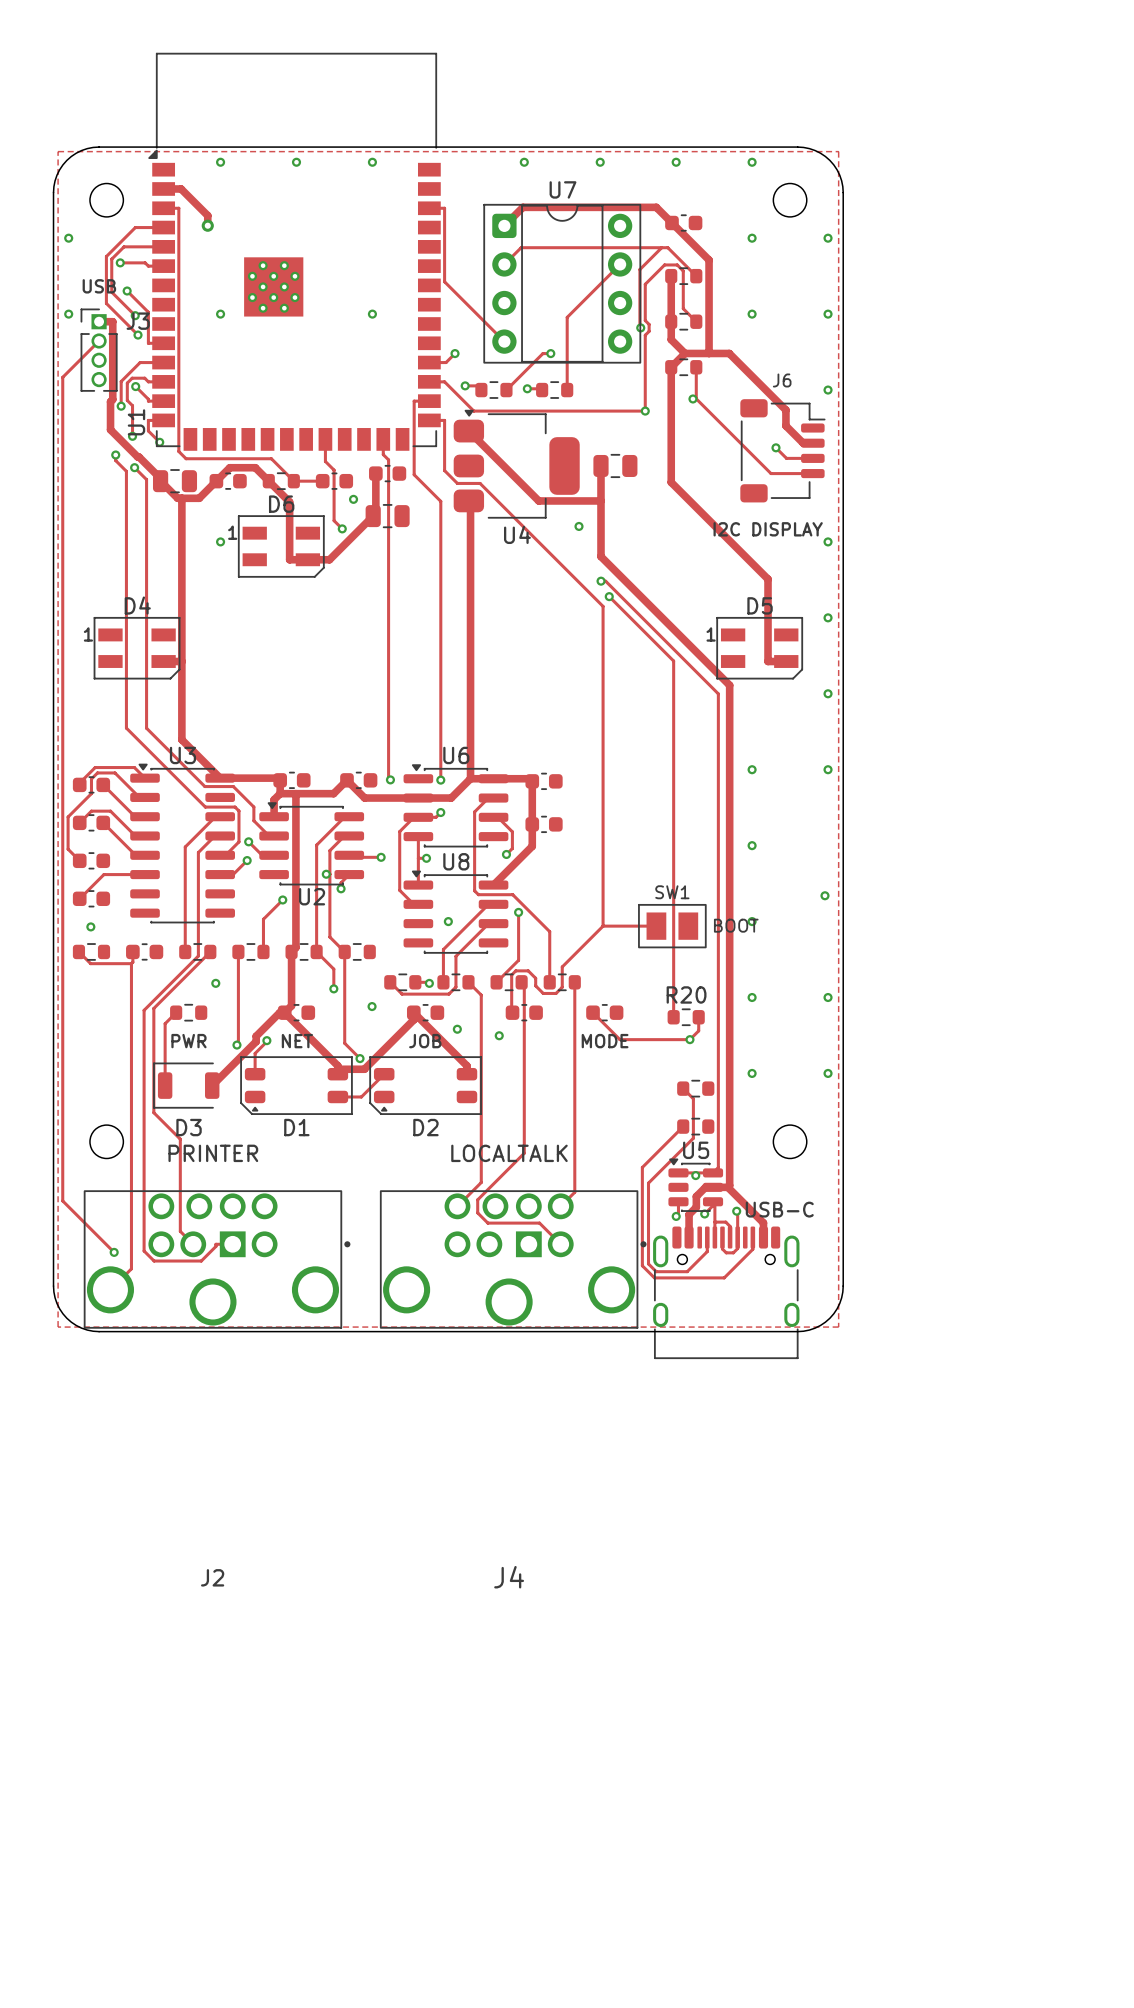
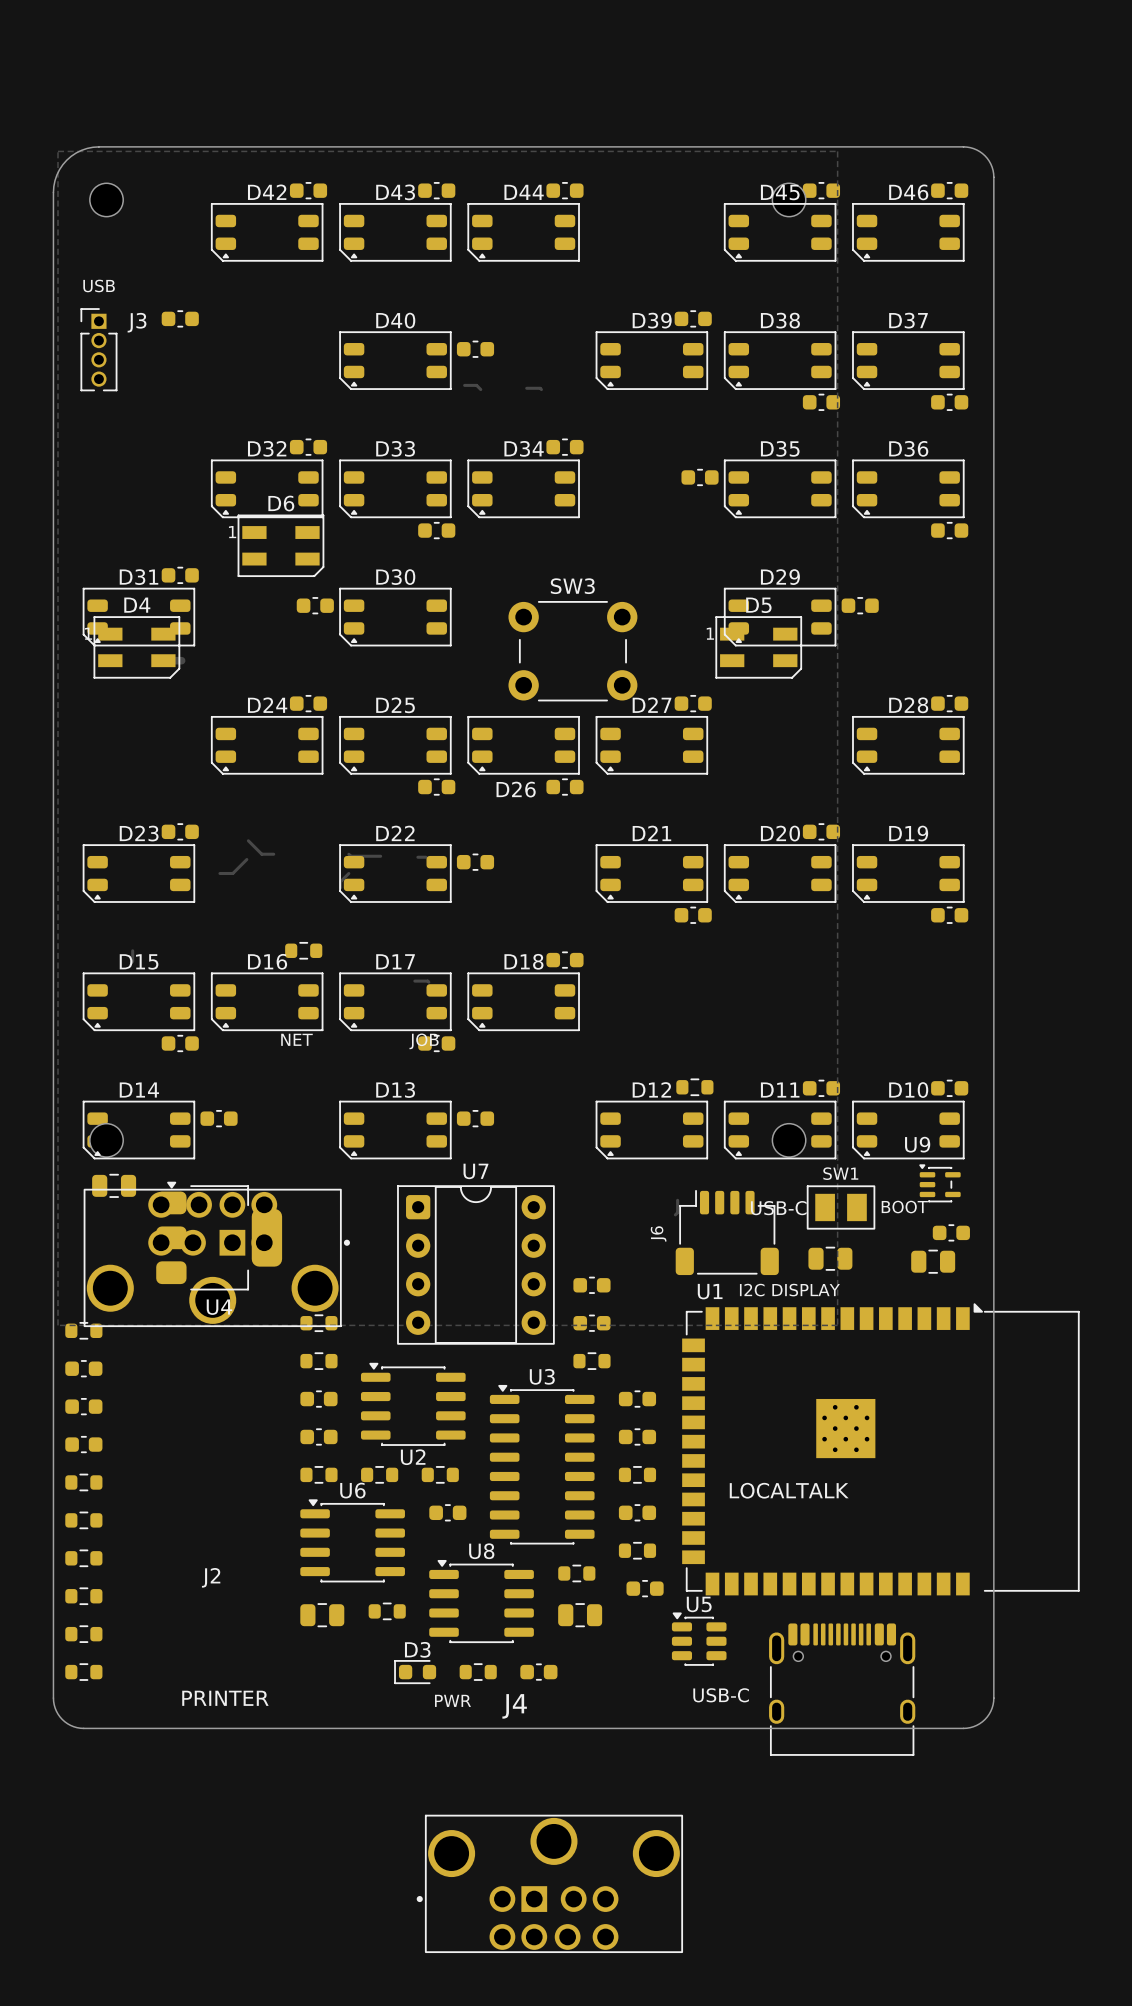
board edge: (797, 147) (815, 150) (829, 160) (839, 175) (843, 192) (843, 1286) (841, 1297) (837, 1308) (829, 1318) (820, 1325) (809, 1330) (797, 1331) (99, 1331) (81, 1328) (66, 1318) (56, 1303) (53, 1286) -> (796, 146) (966, 147) (976, 149) (984, 155) (990, 164) (993, 173) (993, 1698) (989, 1714) (976, 1725) (963, 1728) (83, 1728) (70, 1725) (58, 1714) (53, 1698) (53, 1284)
via: (220, 162) -> none
via: (296, 162) -> none
via: (372, 162) -> none
via: (524, 162) -> none
via: (600, 162) -> none
via: (676, 162) -> none
via: (752, 162) -> none
track: (163, 188) (181, 188) (207, 215) (207, 225) -> none
part: none -> (308, 190)
part: none -> (436, 190)
part: none -> (564, 190)
part: none -> (821, 190)
part: none -> (949, 190)
track: (163, 208) (178, 208) (178, 451) (186, 458) (271, 458) (293, 481) (322, 481) -> none
track: (429, 208) (444, 208) (444, 281) (504, 341) -> none
part: (683, 223) -> none
via: (207, 225) -> none
track: (504, 225) (522, 207) (656, 207) (709, 260) (709, 353) -> none
track: (163, 227) (135, 227) (106, 256) (106, 303) (138, 335) -> none
D42: none -> (267, 232)
D43: none -> (395, 232)
D44: none -> (523, 232)
D45: none -> (780, 232)
D46: none -> (908, 232)
via: (68, 238) -> none
via: (752, 238) -> none
via: (828, 238) -> none
track: (163, 246) (124, 246) (111, 259) (111, 292) (135, 315) -> none
track: (661, 247) (639, 269) (640, 327) -> none
U1 rotation: 0° (294, 251) -> 90° clockwise (880, 1449)
U1 position: (294, 251) -> (880, 1449)
track: (120, 262) (145, 262) (148, 266) (163, 266) -> none
via: (120, 262) -> none
track: (504, 264) (521, 247) (667, 247) (696, 276) -> none
track: (620, 264) (567, 317) (567, 390) -> none
track: (671, 276) (671, 339) (685, 353) -> none
part: (683, 276) -> none
U7 position: (562, 283) -> (475, 1264)
track: (127, 291) (148, 312) (148, 343) (163, 343) -> none
via: (127, 291) -> none
part footprint: [665, 312, 703, 331] -> [674, 310, 712, 328]
via: (68, 314) -> none
via: (220, 314) -> none
via: (372, 314) -> none
via: (752, 314) -> none
via: (828, 314) -> none
via: (135, 315) -> none
part: none -> (180, 318)
track: (99, 321) (112, 321) (112, 399) (110, 401) (110, 429) (160, 478) (160, 481) (177, 498) (199, 498) (229, 467) (255, 467) (289, 502) (289, 559) (329, 559) (375, 513) (375, 473) -> none
track: (696, 321) (683, 308) (683, 271) (677, 264) (664, 264) (645, 284) (645, 320) (649, 324) (649, 331) (645, 335) (645, 411) (473, 411) (444, 381) (429, 381) -> none
via: (640, 327) -> none
via: (138, 335) -> none
track: (99, 340) (62, 377) (62, 1200) (114, 1252) -> none
part: none -> (475, 349)
track: (455, 353) (446, 362) (429, 362) -> none
via: (455, 353) -> none
track: (550, 353) (542, 353) (506, 390) -> none
via: (550, 353) -> none
track: (685, 353) (729, 353) (785, 410) (785, 425) (803, 443) (812, 443) -> none
track: (685, 353) (671, 367) (671, 482) (768, 579) (768, 661) (786, 661) -> none
D40: none -> (395, 360)
D39: none -> (651, 360)
D38: none -> (780, 360)
D37: none -> (908, 360)
track: (163, 362) (140, 362) (121, 381) (121, 406) -> none
part: (683, 367) -> none
track: (696, 367) (696, 398) -> none
track: (163, 381) (148, 381) (144, 378) (132, 378) (127, 383) (127, 400) (132, 405) (132, 436) -> none
via: (465, 385) -> none
track: (135, 386) (148, 401) (163, 401) -> none
via: (135, 386) -> none
via: (527, 388) -> none
part: (493, 390) -> none
part: (554, 390) -> none
via: (828, 390) -> none
via: (692, 398) -> none
track: (696, 398) (771, 473) (812, 473) -> none
track: (429, 401) (414, 401) (414, 474) (440, 501) (440, 780) -> none
part: none -> (821, 402)
part: none -> (949, 402)
via: (121, 406) -> none
via: (645, 411) -> none
track: (163, 420) (148, 420) (148, 430) (159, 442) -> none
track: (429, 420) (444, 420) (444, 470) (457, 483) (480, 483) (603, 606) (603, 926) -> none
track: (468, 431) (538, 500) (600, 500) -> none
via: (132, 436) -> none
track: (325, 439) (325, 461) (334, 470) (334, 520) (342, 528) -> none
track: (383, 439) (383, 454) (388, 459) (388, 778) (390, 779) -> none
via: (159, 442) -> none
part: none -> (308, 447)
part: none -> (564, 447)
track: (775, 447) (786, 458) (812, 458) -> none
via: (775, 447) -> none
J6 rotation: 0° (782, 450) -> 90° counterclockwise (727, 1232)
J6 position: (782, 450) -> (727, 1232)
track: (115, 455) (115, 460) (126, 471) (126, 728) (205, 807) (235, 807) (238, 811) (238, 841) (225, 855) (220, 855) -> none
via: (115, 455) -> none
U4 position: (516, 464) -> (219, 1236)
track: (600, 465) (600, 556) (729, 685) (729, 1185) (727, 1187) -> none
part: (615, 465) -> none
track: (134, 467) (146, 479) (146, 728) (204, 786) (233, 786) (253, 807) (253, 820) (269, 836) (274, 836) -> none
via: (134, 467) -> none
part: (387, 473) -> none
part: none -> (700, 477)
part: (175, 481) -> none
part: (228, 481) -> none
part: (281, 481) -> none
part: (334, 481) -> none
D32: none -> (267, 488)
D33: none -> (395, 488)
D34: none -> (523, 488)
D35: none -> (780, 488)
D36: none -> (908, 488)
track: (181, 498) (181, 739) (220, 778) (277, 778) (280, 780) (280, 793) -> none
via: (353, 499) -> none
track: (468, 500) (470, 502) (470, 778) -> none
part: (387, 516) -> none
via: (579, 526) -> none
via: (342, 528) -> none
text: I2C DISPLAY (768, 529) -> none
part: none -> (436, 530)
part: none -> (949, 530)
via: (220, 541) -> none
via: (828, 541) -> none
part: none -> (180, 575)
track: (601, 581) (605, 581) (718, 693) (718, 1167) (713, 1172) (678, 1172) -> none
via: (601, 581) -> none
track: (609, 596) (673, 661) (673, 1017) -> none
via: (609, 596) -> none
part: none -> (315, 605)
part: none -> (860, 605)
D31: none -> (138, 617)
D30: none -> (395, 617)
D29: none -> (780, 617)
via: (828, 617) -> none
SW3: none -> (572, 651)
via: (828, 693) -> none
part: none -> (308, 703)
part: none -> (693, 703)
part: none -> (949, 703)
D24: none -> (267, 745)
D25: none -> (395, 745)
D26: none -> (523, 745)
D27: none -> (651, 745)
D28: none -> (908, 745)
via: (752, 769) -> none
via: (828, 769) -> none
track: (145, 778) (134, 767) (95, 767) (79, 784) -> none
track: (470, 778) (529, 778) (532, 781) (532, 846) (493, 885) -> none
track: (470, 778) (451, 798) (364, 798) (346, 780) (333, 793) (280, 793) -> none
via: (390, 779) -> none
part: (291, 780) -> none
part: (358, 780) -> none
via: (440, 780) -> none
part: (544, 781) -> none
part: (91, 784) -> none
track: (103, 784) (135, 816) (145, 816) -> none
part: none -> (436, 787)
part: none -> (564, 787)
track: (280, 793) (274, 799) (274, 816) -> none
track: (295, 793) (295, 947) (291, 951) (291, 1005) (284, 1012) -> none
track: (145, 797) (139, 797) (114, 772) (97, 772) (91, 778) (91, 793) (68, 817) (68, 849) (79, 860) -> none
track: (493, 798) (488, 798) (474, 811) (474, 890) (478, 894) (512, 894) (549, 931) (549, 982) -> none
U6 position: (455, 805) -> (352, 1540)
track: (440, 812) (435, 817) (413, 817) (399, 831) (399, 890) (413, 904) (418, 904) -> none
via: (440, 812) -> none
track: (220, 816) (215, 816) (185, 846) (185, 951) -> none
track: (349, 816) (345, 816) (316, 845) (316, 951) (333, 969) (333, 988) -> none
track: (493, 817) (497, 817) (512, 831) (512, 848) (506, 854) -> none
track: (79, 822) (91, 811) (110, 811) (135, 836) (145, 836) -> none
part: (91, 822) -> none
track: (103, 822) (135, 855) (145, 855) -> none
part: (544, 824) -> none
part: none -> (180, 831)
part: none -> (821, 831)
track: (220, 836) (214, 836) (198, 852) (198, 956) (144, 1010) (144, 1251) (154, 1261) (201, 1261) (215, 1244) (232, 1244) -> none
track: (349, 836) (344, 836) (329, 850) (329, 937) (344, 951) (344, 1043) (360, 1058) -> none
track: (418, 836) (418, 885) -> none
via: (248, 841) -> none
U3 position: (182, 843) -> (542, 1464)
U2 position: (311, 843) -> (413, 1404)
via: (752, 845) -> none
via: (506, 854) -> none
via: (381, 857) -> none
via: (426, 858) -> none
part: (91, 860) -> none
via: (247, 860) -> none
part: none -> (475, 862)
D23: none -> (138, 873)
track: (145, 874) (103, 874) (79, 898) -> none
via: (326, 874) -> none
D22: none -> (395, 873)
D21: none -> (651, 873)
D20: none -> (780, 873)
D19: none -> (908, 873)
via: (341, 888) -> none
via: (824, 895) -> none
part: (91, 898) -> none
track: (282, 899) (263, 919) (263, 951) -> none
via: (282, 899) -> none
track: (493, 904) (488, 904) (443, 949) (443, 982) -> none
U8 position: (455, 912) -> (481, 1601)
track: (518, 912) (518, 960) (496, 982) -> none
via: (518, 912) -> none
part: none -> (693, 915)
part: none -> (949, 915)
via: (448, 921) -> none
via: (752, 921) -> none
track: (493, 923) (488, 923) (455, 956) (455, 987) (448, 994) (402, 994) (390, 982) -> none
via: (90, 926) -> none
track: (603, 926) (562, 966) (562, 987) (556, 993) (543, 993) (535, 985) (535, 978) (528, 970) (515, 970) (511, 975) (512, 1012) -> none
track: (603, 926) (656, 926) -> none
SW1 position: (672, 926) -> (841, 1207)
track: (78, 951) (90, 963) (131, 963) (131, 1268) (110, 1289) -> none
part: (91, 951) -> none
part: (144, 951) -> none
part: (197, 951) -> none
track: (210, 951) (153, 1008) (153, 1112) (180, 1139) (180, 1231) (193, 1244) -> none
track: (238, 951) (236, 1045) -> none
part: (250, 951) -> none
part: (357, 951) -> none
part: none -> (564, 960)
part: (402, 982) -> none
part: (455, 982) -> none
track: (468, 982) (481, 995) (481, 1182) (457, 1206) -> none
part: (509, 982) -> none
track: (521, 982) (524, 984) (524, 1153) (477, 1199) (477, 1212) (487, 1223) (539, 1223) (560, 1244) -> none
part: (562, 982) -> none
track: (574, 982) (574, 1192) (560, 1206) -> none
via: (215, 983) -> none
via: (429, 983) -> none
via: (333, 988) -> none
via: (752, 997) -> none
via: (828, 997) -> none
D15: none -> (138, 1001)
D16: none -> (267, 1001)
D17: none -> (395, 1001)
D18: none -> (523, 1001)
via: (372, 1006) -> none
track: (176, 1012) (165, 1023) (165, 1085) -> none
part: (188, 1012) -> none
track: (284, 1012) (337, 1065) (337, 1074) -> none
track: (284, 1012) (279, 1012) (256, 1036) (256, 1041) (212, 1085) -> none
part: (296, 1012) -> none
part position: (425, 1012) -> (436, 1043)
part: (524, 1012) -> none
track: (593, 1012) (619, 1039) (689, 1039) (698, 1030) (698, 1017) -> none
part: (604, 1012) -> none
R20: (686, 1017) -> none
via: (457, 1029) -> none
via: (499, 1035) -> none
via: (689, 1039) -> none
track: (266, 1040) (255, 1053) (255, 1074) -> none
via: (266, 1040) -> none
text: PWR (188, 1041) -> none
text: MODE (605, 1041) -> none
part: none -> (180, 1043)
via: (236, 1045) -> none
via: (360, 1058) -> none
D3 footprint: [153, 1062, 220, 1109] -> [394, 1660, 437, 1685]
track: (337, 1069) (364, 1069) (413, 1019) (413, 1012) (466, 1065) (466, 1074) -> none
via: (752, 1073) -> none
via: (828, 1073) -> none
track: (384, 1074) (361, 1096) (337, 1096) -> none
D1: (296, 1085) -> none
D2: (425, 1085) -> none
track: (683, 1088) (693, 1098) (693, 1138) (648, 1183) (648, 1263) (656, 1271) (687, 1271) (707, 1251) (707, 1237) -> none
part: none -> (821, 1088)
part: none -> (949, 1088)
part: none -> (219, 1118)
part: none -> (475, 1118)
track: (683, 1126) (642, 1167) (642, 1265) (654, 1277) (724, 1277) (752, 1249) (752, 1237) -> none
part: (695, 1126) -> none
D3 name position: D3 (189, 1127) -> D3 (417, 1649)
D14: none -> (138, 1130)
D13: none -> (395, 1130)
D12: none -> (651, 1130)
D11: none -> (780, 1130)
D10: none -> (908, 1130)
text: PRINTER (213, 1153) -> none
text: LOCALTALK (509, 1153) -> none
via: (695, 1175) -> none
U9: none -> (939, 1183)
U5 position: (695, 1185) -> (699, 1639)
part: none -> (114, 1185)
track: (727, 1187) (705, 1187) (696, 1196) (696, 1207) (689, 1214) (689, 1237) -> none
track: (727, 1187) (763, 1222) (763, 1237) -> none
track: (736, 1211) (737, 1248) (733, 1252) (726, 1252) (722, 1249) (722, 1237) -> none
via: (736, 1211) -> none
track: (704, 1213) (713, 1205) (713, 1201) (714, 1203) (714, 1237) -> none
via: (704, 1213) -> none
via: (676, 1216) -> none
track: (714, 1222) (725, 1222) (730, 1226) (730, 1237) -> none
part: none -> (951, 1232)
via: (114, 1252) -> none
J4 rotation: 0° (513, 1259) -> 180° (549, 1883)
J4 position: (513, 1259) -> (549, 1883)
part: none -> (830, 1258)
part: none -> (933, 1261)
part: none -> (591, 1285)
text: none -> I2C DISPLAY (789, 1290)
part: (726, 1292) -> none
part: none -> (318, 1323)
part: none -> (591, 1323)
part: none -> (83, 1330)
part: none -> (318, 1361)
part: none -> (591, 1361)
part: none -> (83, 1368)
part: none -> (318, 1399)
part: none -> (637, 1399)
part: none -> (83, 1406)
part: none -> (318, 1436)
part: none -> (637, 1436)
part: none -> (83, 1444)
part: none -> (318, 1474)
part: none -> (379, 1474)
part: none -> (440, 1474)
part: none -> (637, 1474)
part: none -> (83, 1482)
text: none -> LOCALTALK (789, 1490)
part: none -> (447, 1512)
part: none -> (637, 1512)
part: none -> (83, 1520)
part: none -> (637, 1550)
part: none -> (83, 1558)
part: none -> (576, 1573)
J4 name position: J4 (509, 1577) -> J4 (514, 1706)
part: none -> (645, 1588)
part: none -> (83, 1596)
part: none -> (387, 1611)
part: none -> (322, 1615)
part: none -> (580, 1615)
part: none -> (83, 1634)
part: none -> (83, 1672)
part: none -> (478, 1672)
part: none -> (538, 1672)
part: none -> (842, 1689)
text: none -> USB-C (721, 1695)
text: none -> PRINTER (225, 1698)
text: none -> PWR (452, 1700)

